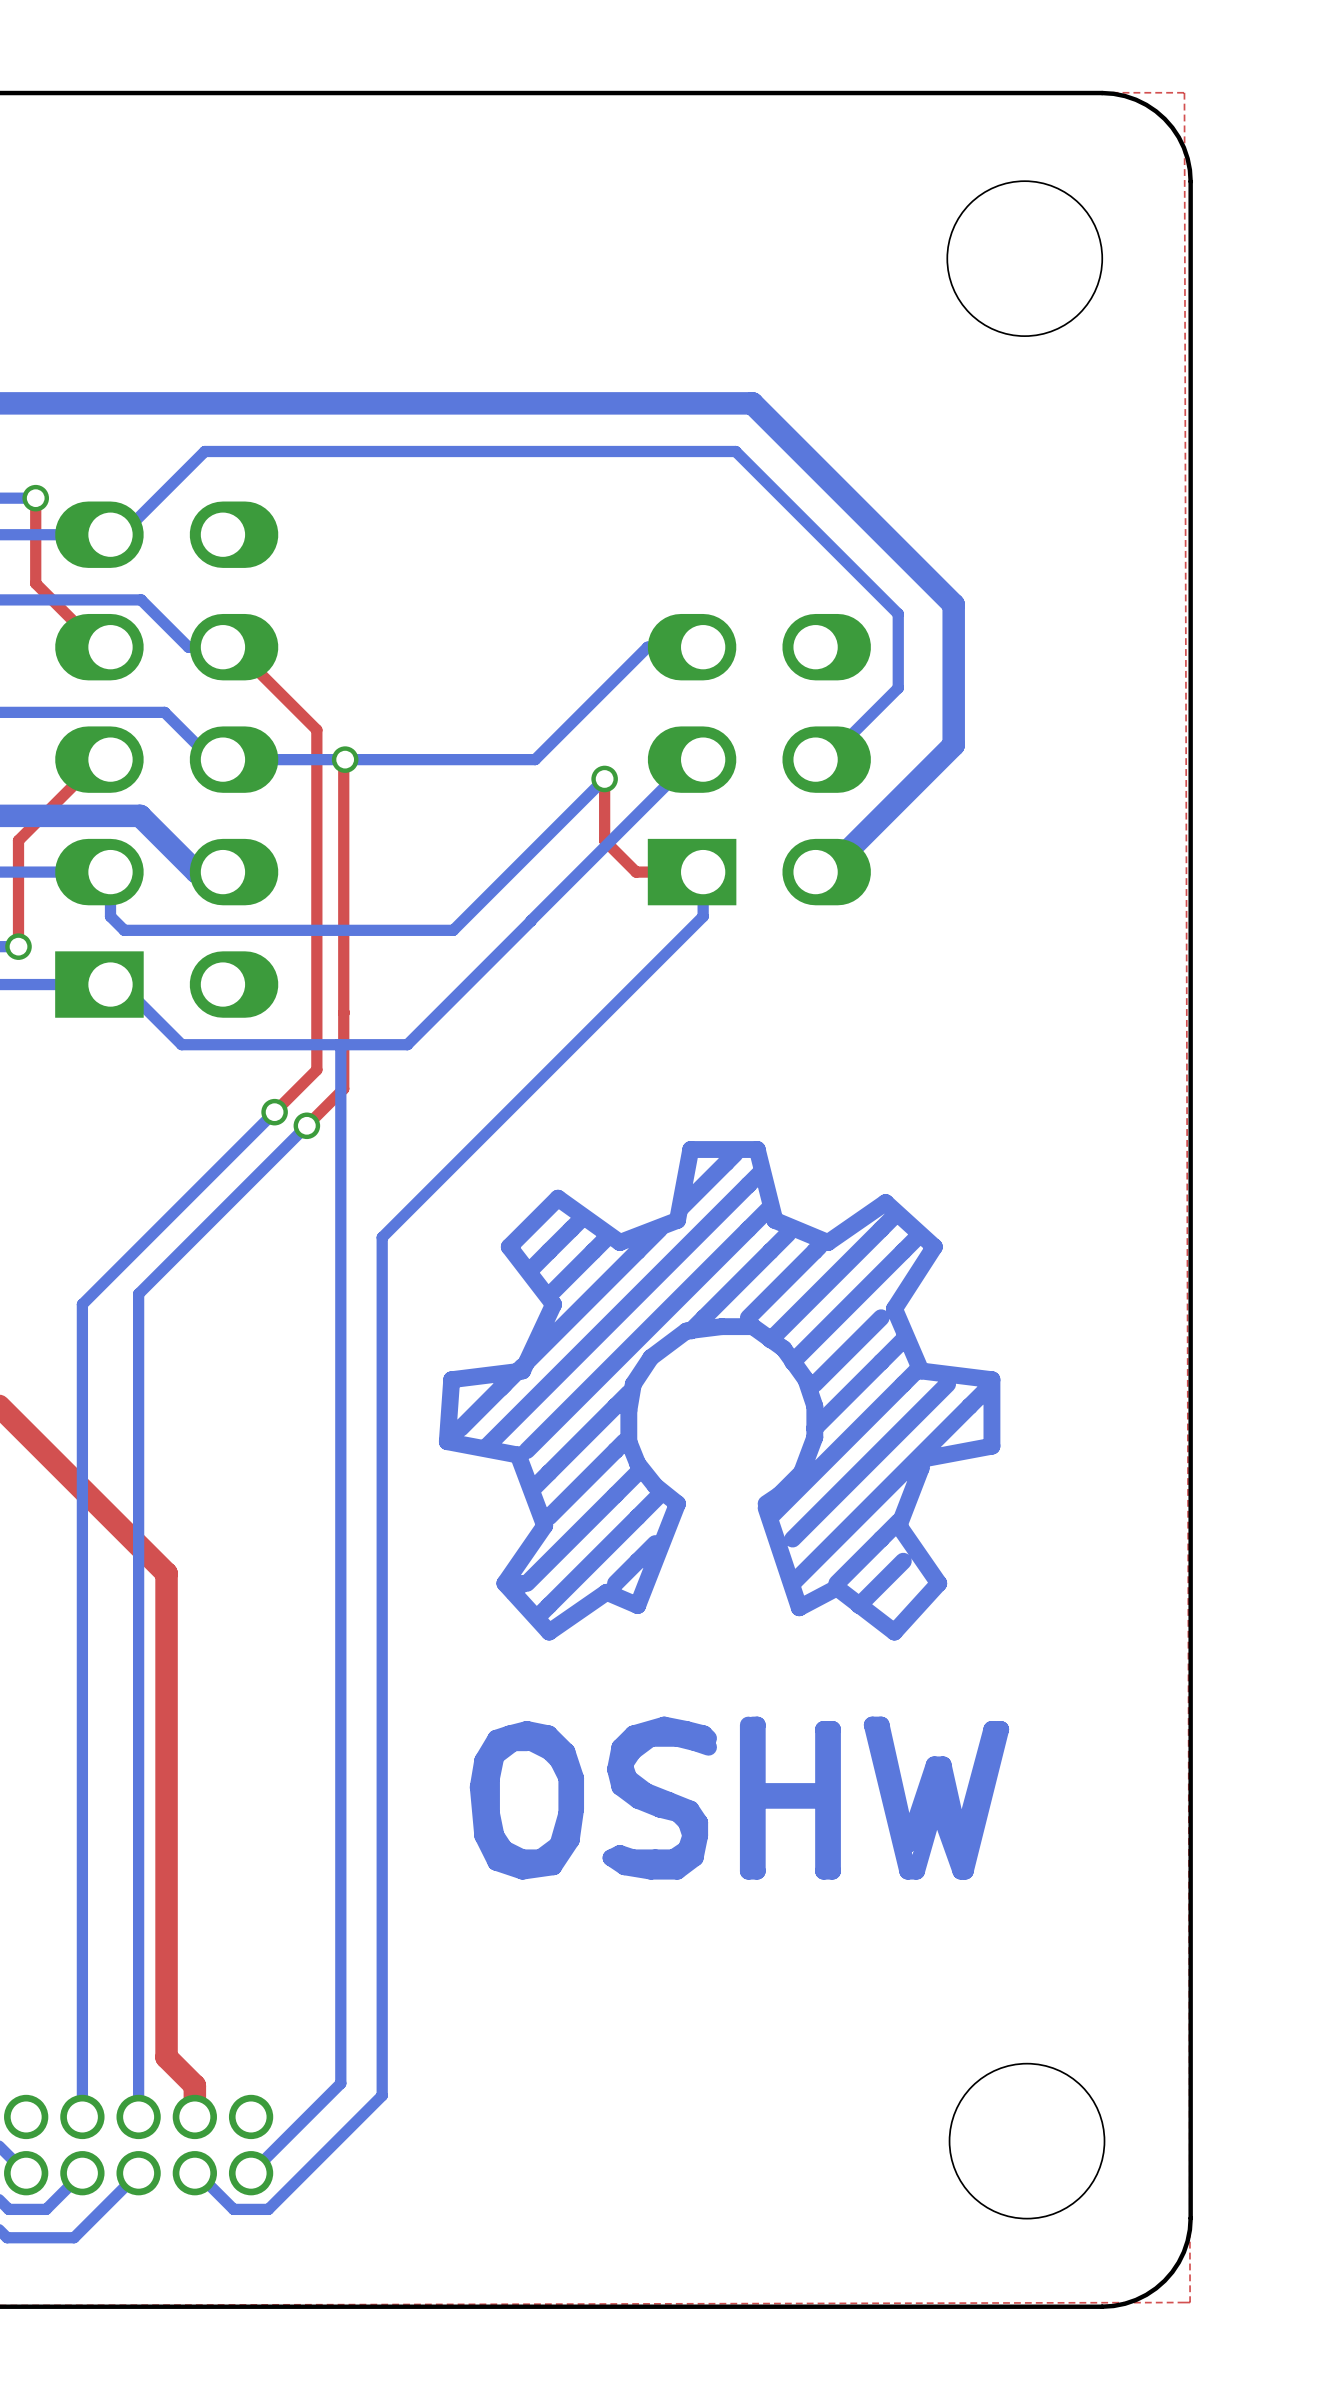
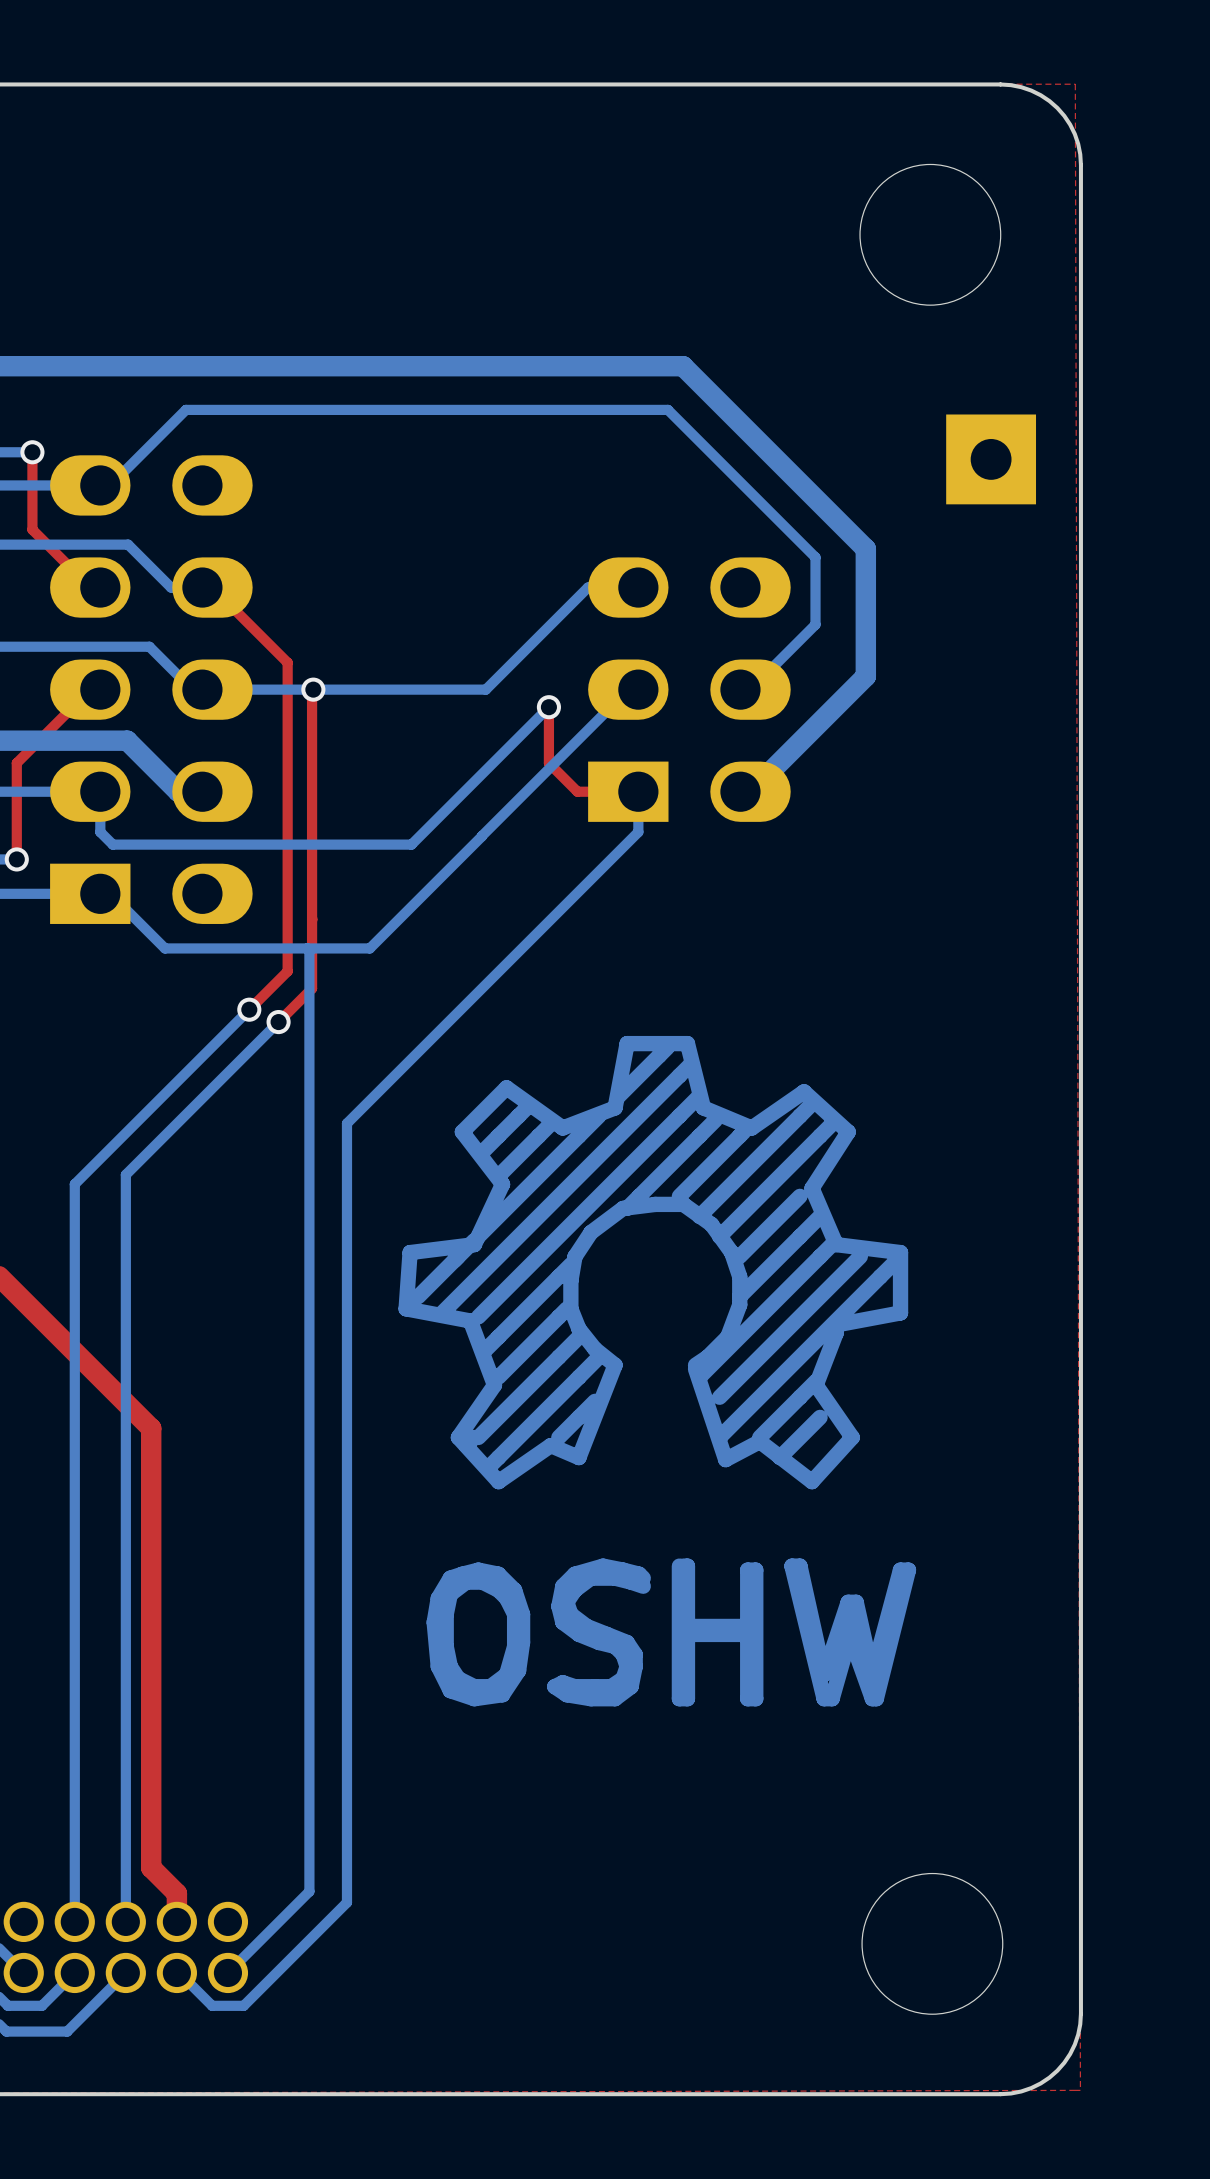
part: none -> (991, 459)

